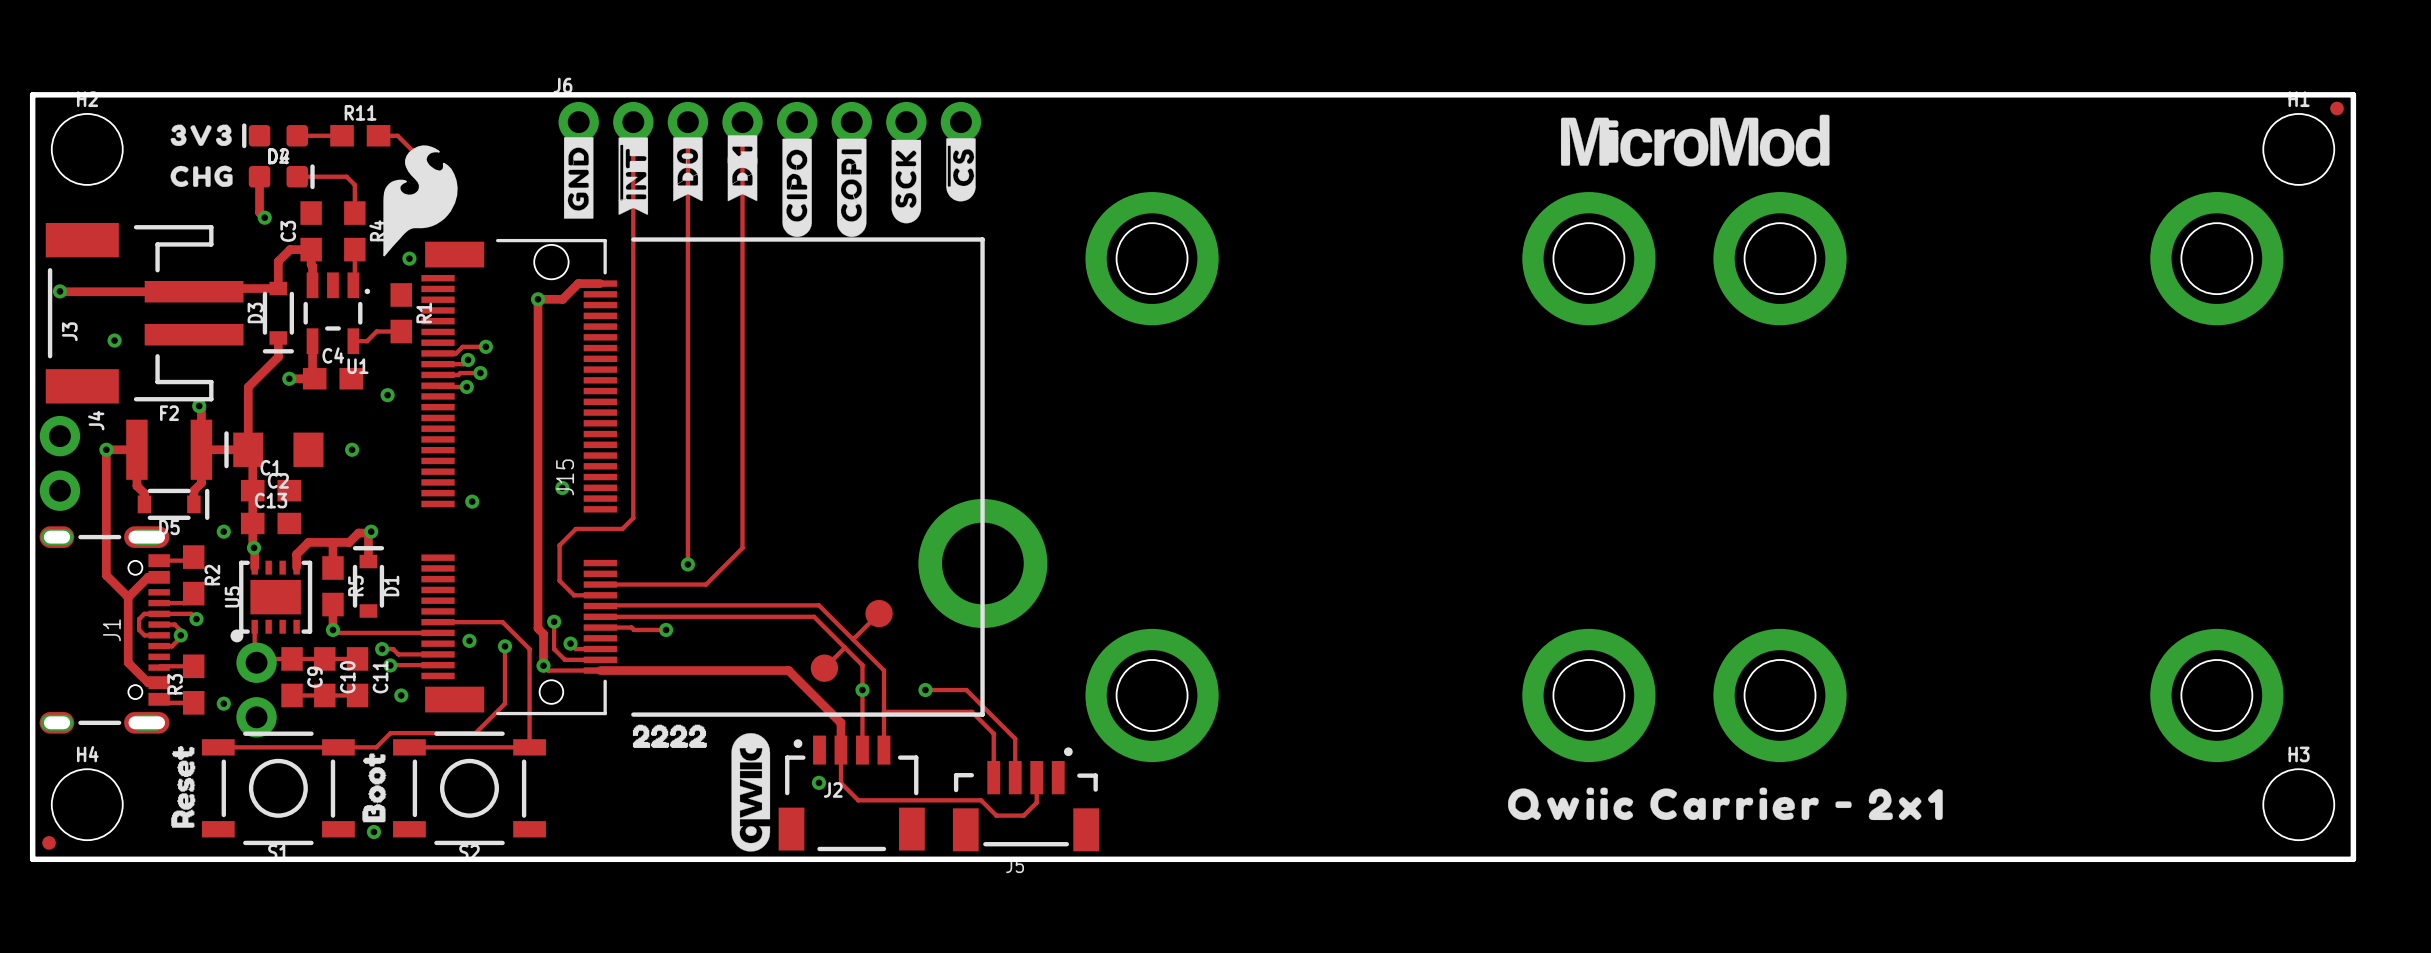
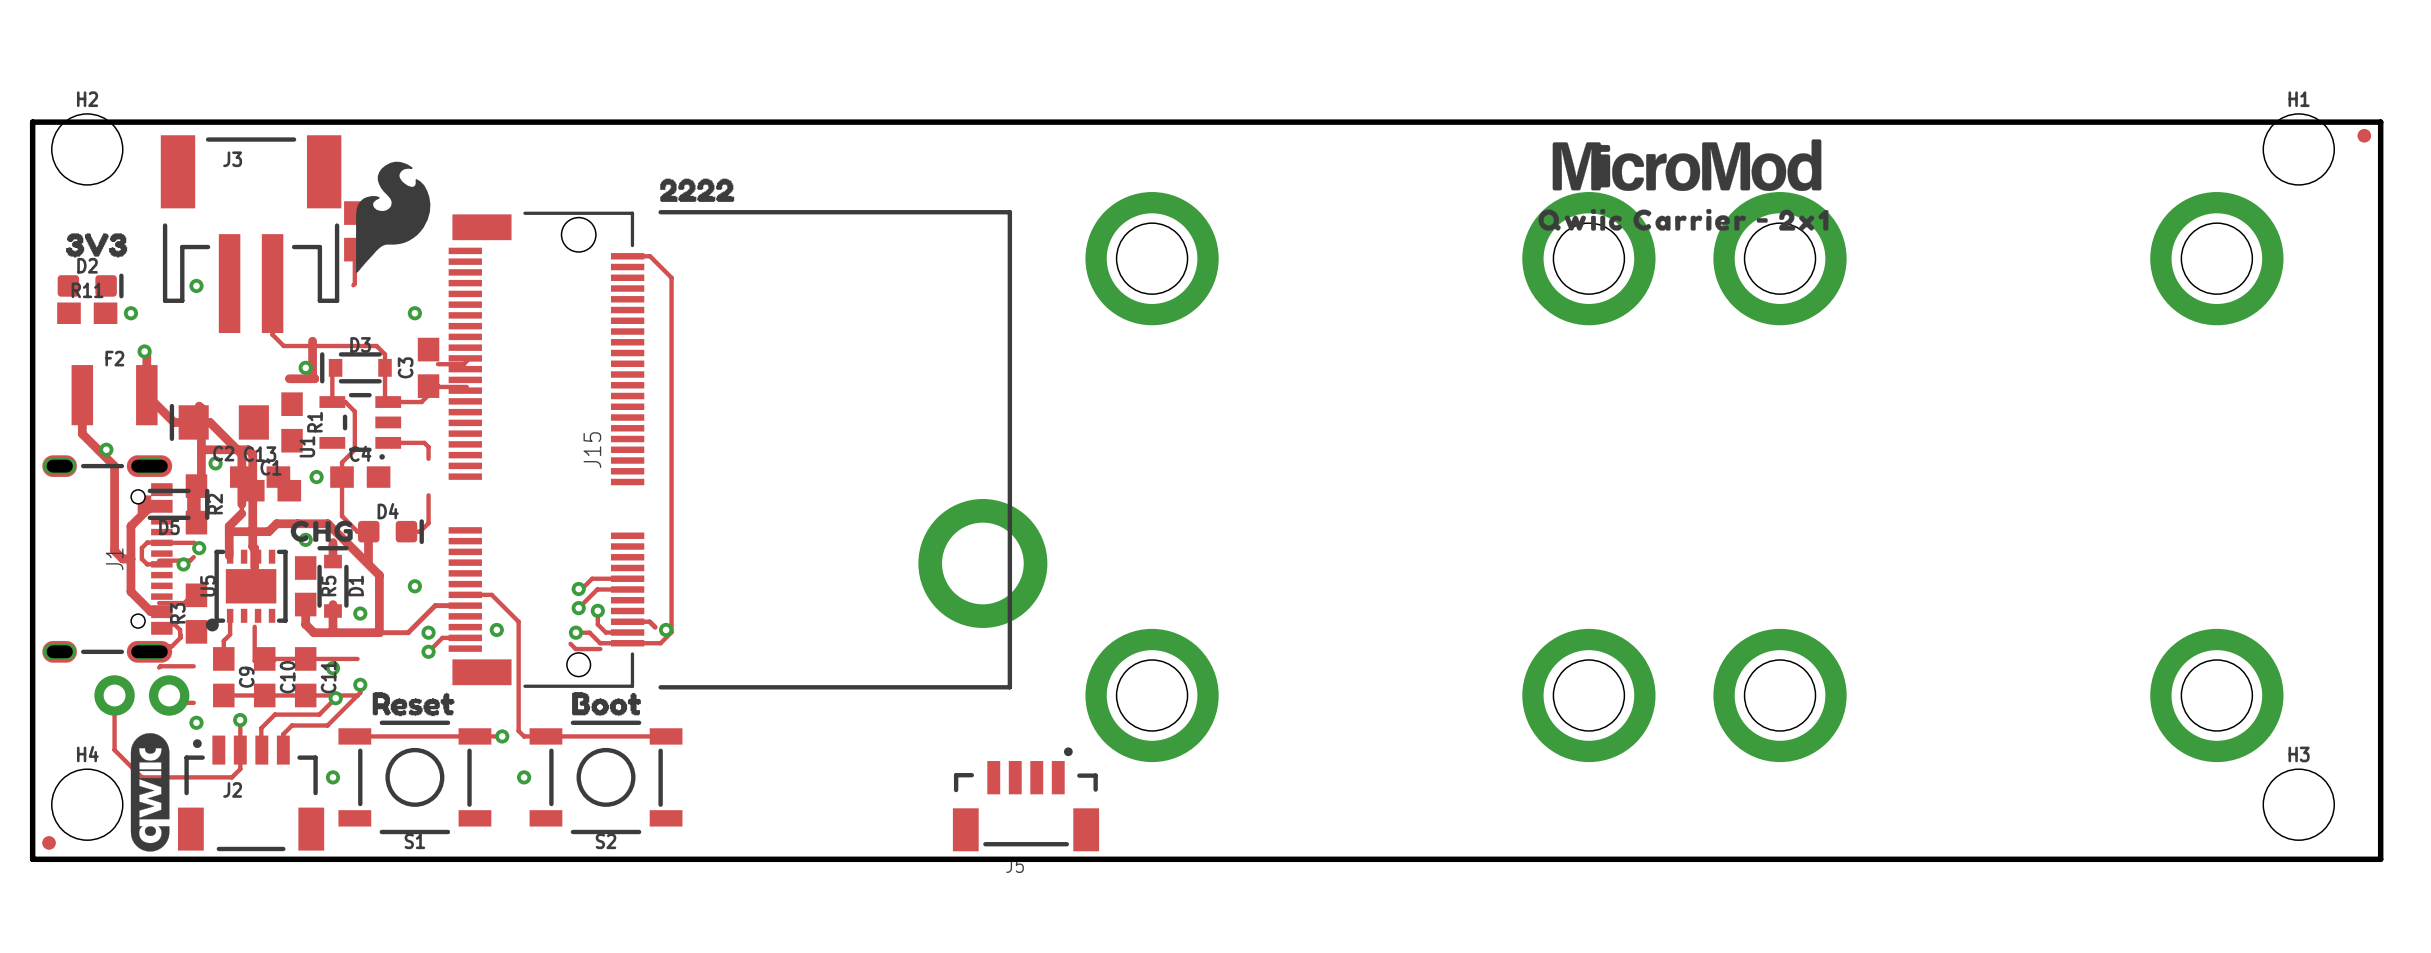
part position: (2337, 108) -> (2364, 135)
board edge: (32, 122) (32, 94) (2353, 94) (2353, 859) -> (32, 122) (2380, 122) (2380, 859) (2353, 859)
track: (633, 122) (633, 518) (622, 528) (575, 528) (559, 545) (559, 580) (574, 595) (600, 595) -> none
track: (687, 122) (687, 564) -> none
track: (742, 122) (742, 548) (706, 584) (600, 584) -> none
J6: (769, 122) -> none
drawing: [170, 124, 232, 146] -> none
D2 rotation: 0° (275, 135) -> 180° (90, 285)
D2 position: (275, 135) -> (90, 285)
track: (297, 135) (342, 135) -> none
R11 position: (360, 135) -> (87, 313)
track: (378, 135) (397, 135) (412, 150) (412, 163) -> none
drawing: [563, 135, 976, 237] -> none
drawing position: (1695, 140) -> (1687, 165)
drawing position: (201, 176) -> (321, 531)
track: (259, 176) (259, 212) (264, 217) -> none
D4 position: (281, 176) -> (390, 531)
track: (297, 176) (346, 176) (354, 184) (354, 213) -> none
drawing: none -> [660, 178, 735, 202]
drawing position: (420, 200) -> (393, 217)
drawing: none -> [1538, 208, 1829, 231]
via: (264, 217) -> none
C3 position: (311, 231) -> (428, 367)
drawing: none -> [66, 233, 128, 258]
line: (633, 239) (982, 239) (982, 714) (633, 714) -> (660, 212) (1009, 212) (1009, 687) (660, 687)
track: none -> (627, 256) (650, 256) (671, 277) (671, 632) (660, 643) (600, 643) (589, 632) (575, 632)
via: (409, 258) -> none
track: none -> (272, 283) (272, 334) (283, 346) (376, 346) (385, 354) (385, 398) (388, 402) (421, 402) (428, 395) (428, 386)
track: (600, 283) (578, 283) (562, 299) (538, 299) (538, 628) (543, 633) (543, 665) (548, 670) (788, 670) (840, 722) (840, 783) (858, 800) (981, 800) (996, 815) (1023, 815) (1036, 802) (1036, 777) -> none
via: none -> (196, 285)
track: (312, 285) (311, 249) (290, 249) (278, 261) (278, 288) (197, 288) (194, 291) (59, 291) -> none
via: (59, 291) -> none
via: (538, 299) -> none
via: none -> (130, 313)
J3 rotation: 0° (144, 313) -> 90° clockwise (251, 234)
J3 position: (144, 313) -> (251, 234)
U1 rotation: 0° (336, 313) -> 90° clockwise (360, 426)
U1 position: (336, 313) -> (360, 426)
R1 position: (401, 313) -> (292, 422)
via: none -> (414, 313)
D3 rotation: 0° (278, 317) -> 90° clockwise (355, 367)
D3 position: (278, 317) -> (355, 367)
track: (401, 331) (376, 331) (366, 341) (353, 341) -> none
track: (278, 337) (278, 356) (248, 387) (248, 449) -> none
via: (114, 340) -> none
track: (485, 346) (462, 346) (455, 353) (438, 353) -> none
via: (485, 346) -> none
track: none -> (144, 351) (146, 353) (146, 395) (174, 422) (209, 422) (241, 454) (241, 513) (229, 526) (230, 556)
via: none -> (144, 351)
via: (468, 359) -> none
track: none -> (335, 367) (332, 371) (332, 402) (345, 402) (354, 411) (354, 449) (342, 462) (342, 516) (357, 531) (368, 531)
track: (480, 373) (438, 374) -> none
via: (480, 373) -> none
via position: (289, 378) -> (305, 367)
C4 position: (332, 378) -> (360, 477)
via: (466, 386) -> none
track: none -> (82, 395) (82, 433) (114, 466) (114, 550) (122, 558) (130, 558)
via: (387, 395) -> none
via: (199, 406) -> none
track: none -> (388, 442) (424, 442) (428, 447) (428, 458)
F2 position: (169, 449) -> (114, 395)
C2 position: (273, 449) -> (219, 422)
via: (352, 449) -> none
J4: (59, 463) -> none
via: none -> (215, 463)
via: none -> (316, 477)
J15 position: (519, 477) -> (546, 449)
via: (562, 487) -> none
track: none -> (428, 495) (428, 523) (420, 531) (406, 531)
via: (472, 501) -> none
track: (144, 504) (144, 493) (136, 485) (136, 449) (106, 449) (106, 575) (128, 597) -> none
track: none -> (161, 506) (150, 506) (130, 526) (130, 591) (150, 611) (161, 611)
C13 position: (271, 523) -> (260, 477)
via: (223, 531) -> none
track: none -> (229, 531) (268, 531) (276, 523) (327, 523) (379, 575) (379, 632)
via: (371, 531) -> none
track: (369, 533) (358, 533) (349, 542) (308, 542) (296, 554) (296, 567) -> none
via: none -> (305, 539)
track: none -> (161, 542) (147, 542) (141, 548) (141, 558) (147, 564) (161, 564)
track: none -> (161, 542) (193, 542) (199, 548)
via: (254, 547) -> none
via: none -> (199, 548)
via: none -> (183, 564)
via: (687, 564) -> none
R2 position: (193, 575) -> (196, 504)
track: (159, 577) (148, 577) (128, 597) -> none
track: none -> (627, 578) (592, 578) (581, 589) (578, 589)
D1 position: (368, 581) -> (332, 581)
R5 position: (332, 586) -> (305, 586)
via: none -> (414, 586)
via: none -> (578, 589)
track: none -> (627, 589) (597, 589) (578, 608)
track: none -> (465, 594) (491, 594) (518, 621) (518, 730) (524, 736) (666, 736)
track: (128, 597) (128, 662) (148, 682) (159, 682) -> none
U5 position: (271, 601) -> (246, 590)
track: none -> (305, 604) (305, 624) (313, 632) (379, 632)
track: none -> (465, 605) (435, 605) (408, 632) (379, 632)
track: (600, 606) (818, 605) (883, 670) (883, 750) -> none
via: none -> (578, 608)
track: none -> (597, 610) (597, 624) (605, 632) (627, 632)
via: none -> (597, 610)
via: none -> (360, 613)
track: (879, 613) (853, 639) -> none
part: (879, 613) -> none
track: none -> (230, 615) (230, 634) (223, 640) (223, 658)
track: (600, 616) (814, 616) (862, 665) (862, 750) -> none
track: (196, 619) (191, 613) (144, 613) (139, 619) (139, 629) (144, 635) (159, 635) -> none
via: (196, 619) -> none
track: (554, 621) (554, 649) (564, 659) (600, 659) -> none
via: (554, 621) -> none
track: none -> (627, 621) (649, 621) (655, 627)
track: (438, 622) (502, 622) (529, 649) (529, 747) (409, 747) -> none
track: (600, 627) (666, 629) -> none
J1 position: (104, 629) -> (107, 558)
via: (332, 629) -> none
via: none -> (496, 629)
track: (332, 630) (335, 632) (438, 632) -> none
via: none -> (428, 632)
via: (180, 635) -> none
track: none -> (465, 637) (442, 637) (428, 651)
via: (469, 640) -> none
via position: (570, 643) -> (575, 632)
track: (504, 646) (504, 703) (475, 733) (390, 733) (376, 747) (218, 747) -> none
via: (504, 646) -> none
track: (844, 647) (824, 668) -> none
track: (382, 649) (393, 649) (398, 654) (438, 654) -> none
via: (382, 649) -> none
via: none -> (428, 651)
track: (390, 665) (438, 665) -> none
via: (390, 665) -> none
via: (543, 665) -> none
via: none -> (332, 668)
part: (824, 668) -> none
C9 position: (292, 677) -> (223, 677)
C10 position: (324, 677) -> (264, 677)
C11 position: (357, 677) -> (305, 677)
R3 position: (193, 684) -> (196, 613)
track: none -> (360, 684) (360, 692) (327, 725) (292, 725) (283, 734) (283, 750)
via: none -> (360, 684)
part rotation: 0° (256, 690) -> 90° clockwise (141, 695)
part position: (256, 690) -> (141, 695)
via: (862, 690) -> none
track: (925, 690) (966, 690) (1015, 738) (1015, 777) -> none
via: (925, 690) -> none
drawing: none -> [372, 692, 455, 717]
drawing: none -> [572, 692, 641, 717]
track: none -> (114, 695) (114, 750) (141, 777) (231, 777) (240, 769) (240, 720)
track: none -> (223, 695) (292, 695)
via: (401, 695) -> none
track: none -> (335, 698) (319, 714) (274, 714) (261, 728) (261, 750)
via: none -> (335, 698)
via: (223, 703) -> none
track: (883, 711) (971, 711) (993, 733) (993, 777) -> none
via: none -> (240, 720)
via: none -> (196, 722)
drawing: [632, 724, 771, 852] -> none
drawing: none -> [130, 733, 170, 852]
track: none -> (354, 736) (502, 736)
via: none -> (502, 736)
drawing: [171, 746, 196, 828] -> none
drawing: [362, 753, 387, 823] -> none
via: none -> (332, 777)
via: none -> (524, 777)
via: (818, 782) -> none
drawing: [1508, 787, 1943, 821] -> none
S1 position: (278, 788) -> (414, 777)
S2 position: (469, 788) -> (606, 777)
J2 position: (851, 793) -> (251, 793)
via: (373, 832) -> none

